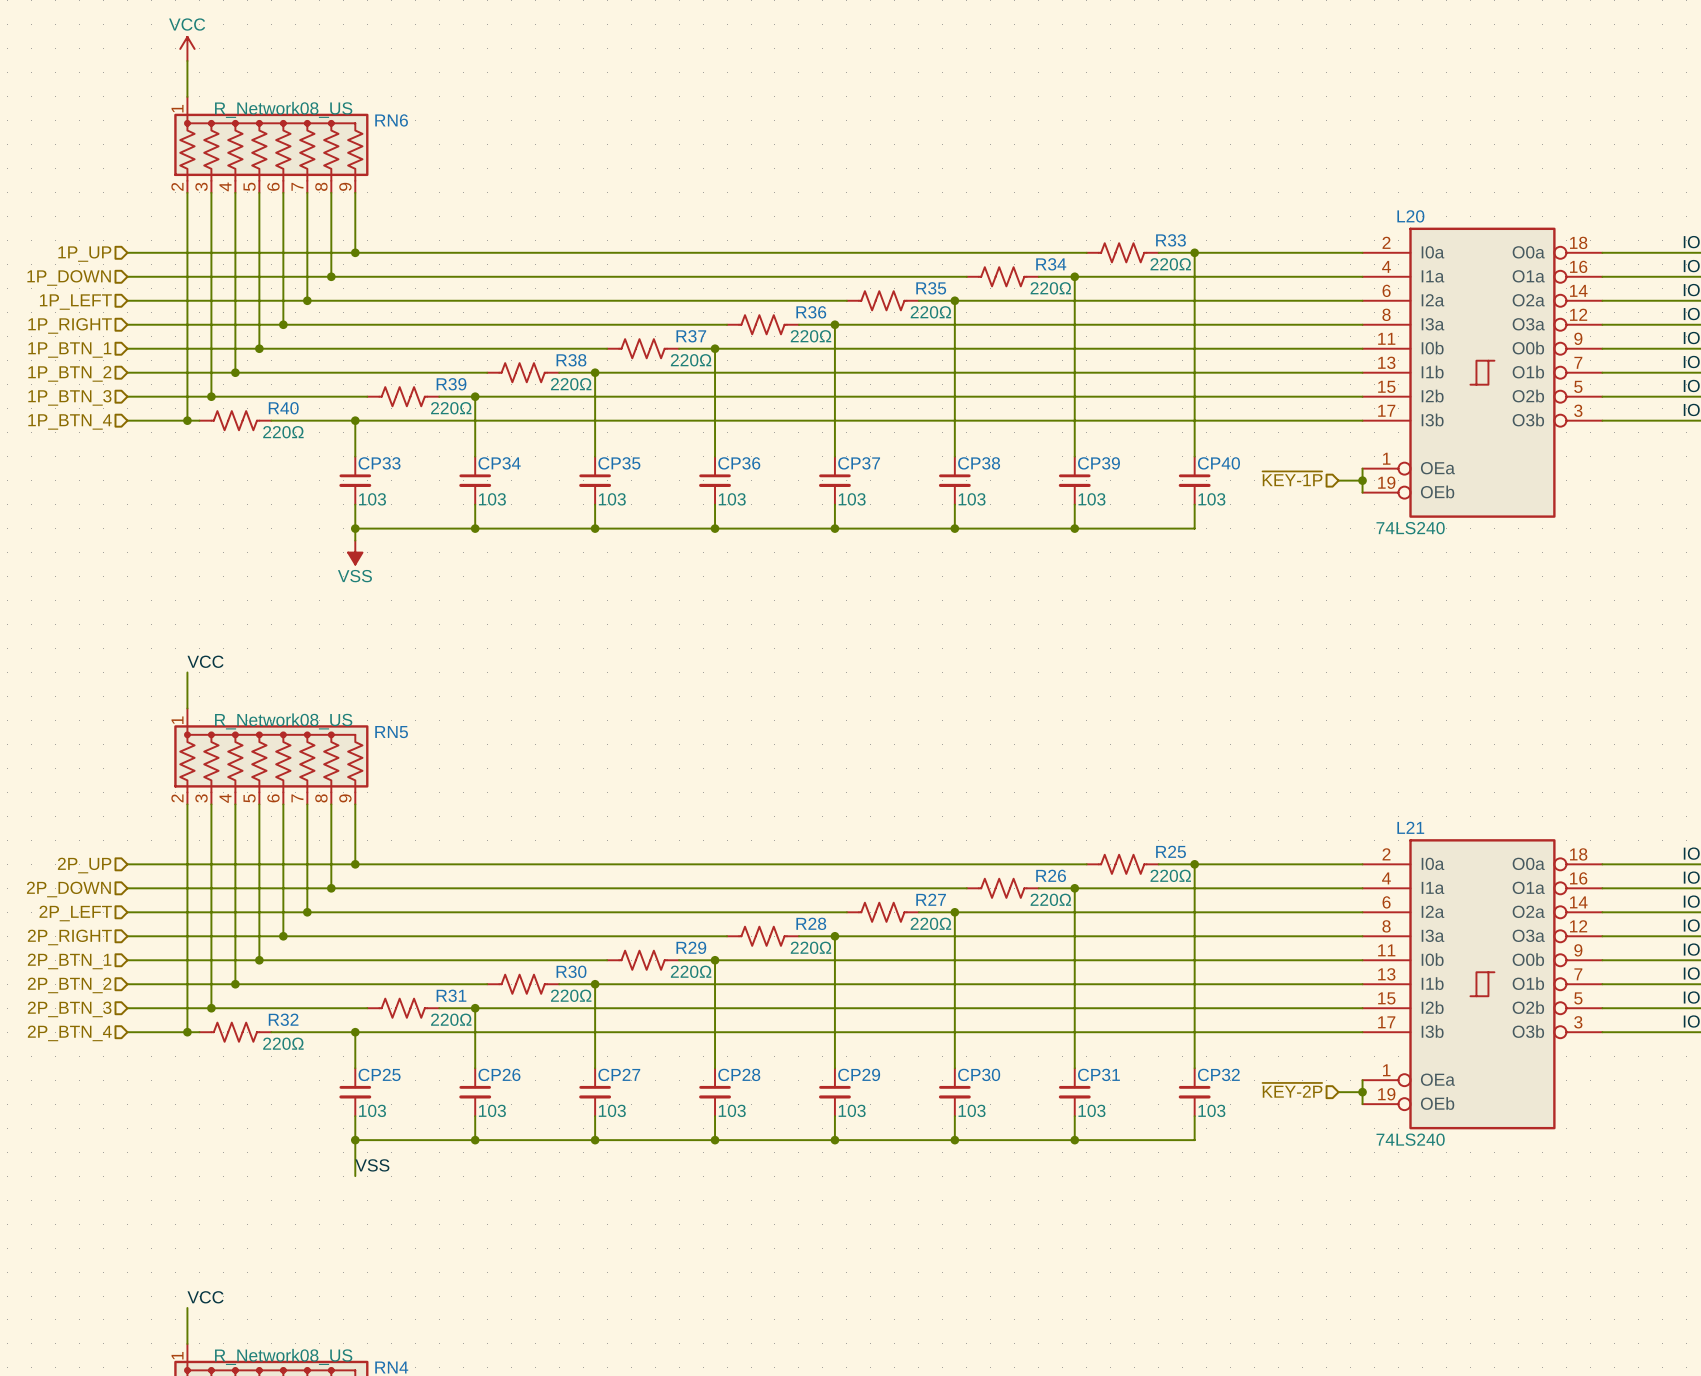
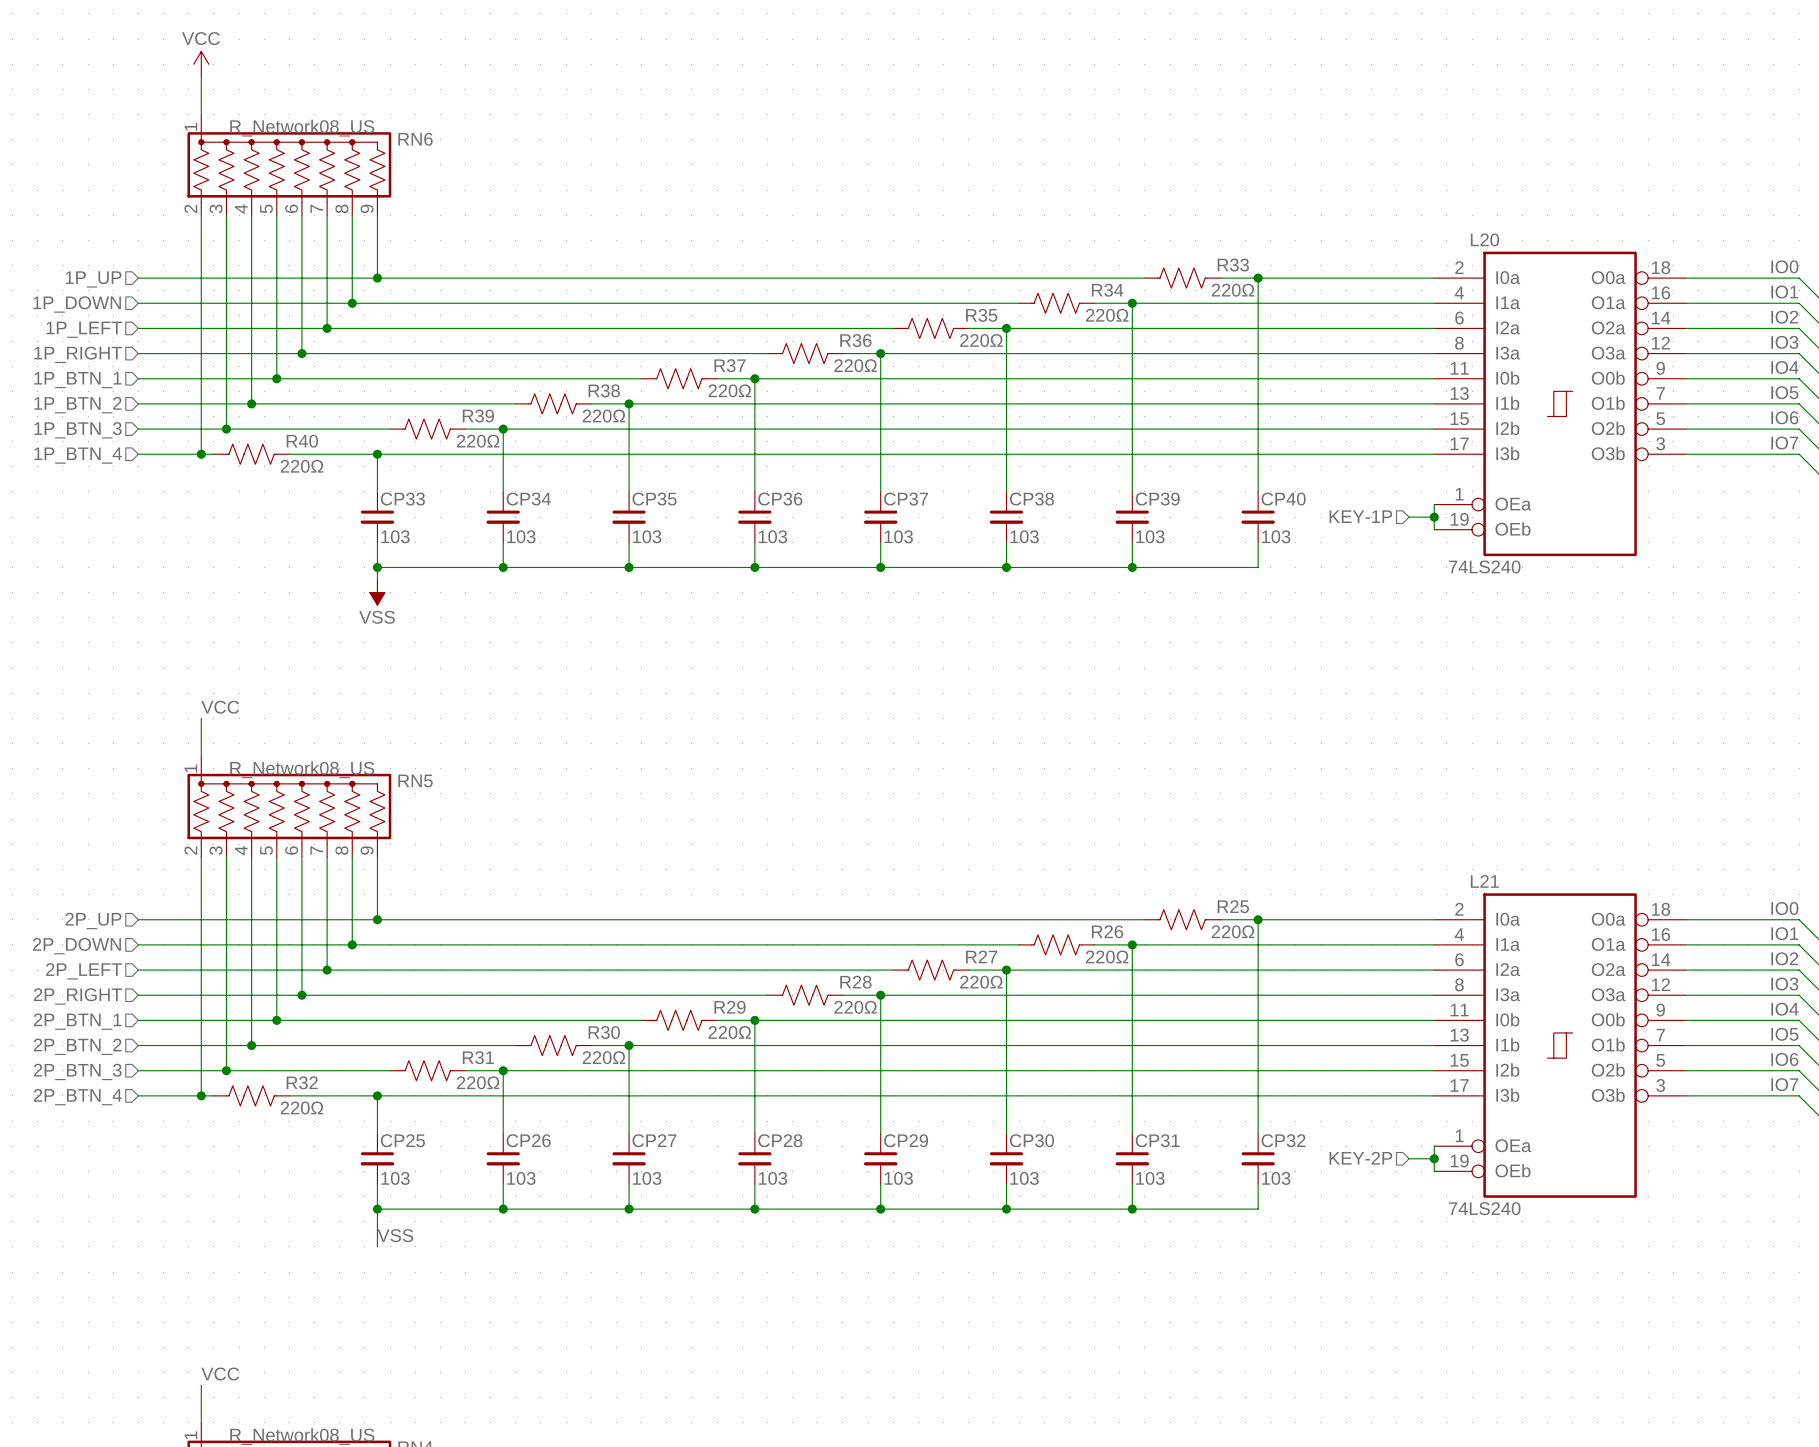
hierarchical label: ~{KEY-1P} (1292, 478) -> KEY-1P (1360, 516)
hierarchical label: ~{KEY-2P} (1292, 1090) -> KEY-2P (1360, 1158)

